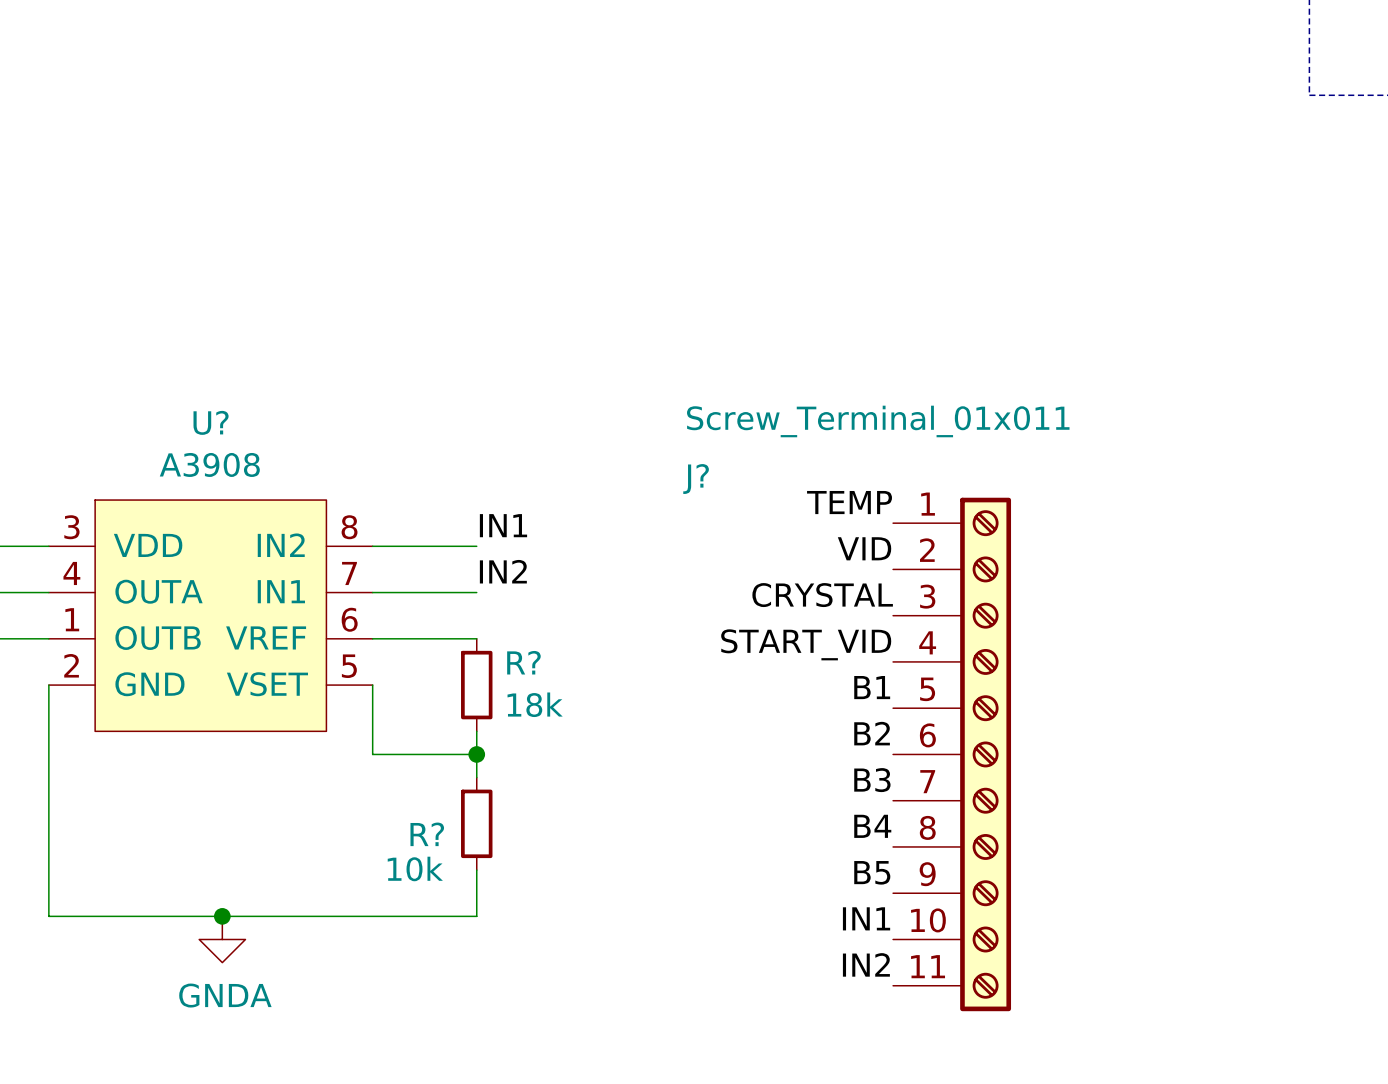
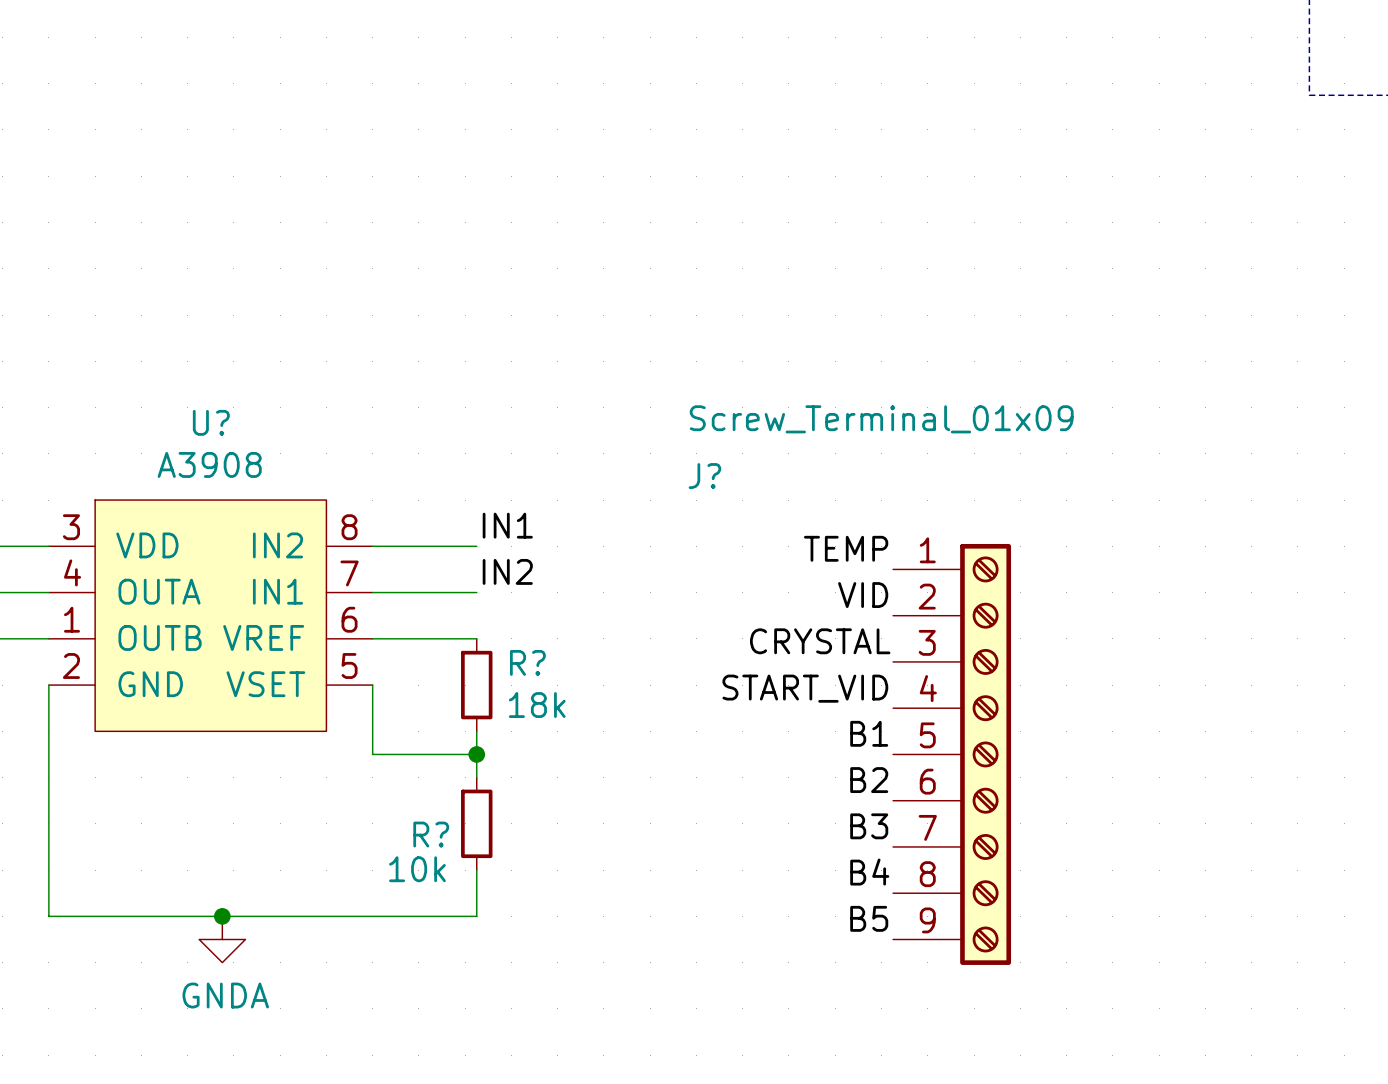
J? value: Screw_Terminal_01x011 (878, 421) -> Screw_Terminal_01x09 (881, 419)
J? symbol: [893, 497, 1012, 1012] -> [893, 543, 1012, 965]
label: TEMP (849, 502) -> none
label: VID (864, 548) -> TEMP (846, 548)
label: CRYSTAL (822, 595) -> VID (863, 595)
label: START_VID (806, 644) -> CRYSTAL (820, 641)
label: B1 (872, 687) -> START_VID (805, 688)
label: B2 (872, 733) -> B1 (869, 733)
label: B3 (872, 780) -> B2 (869, 780)
label: B4 (872, 826) -> B3 (869, 826)
label: B5 (872, 872) -> B4 (869, 872)
label: IN1 (866, 918) -> B5 (869, 918)
label: IN2 (866, 964) -> none

